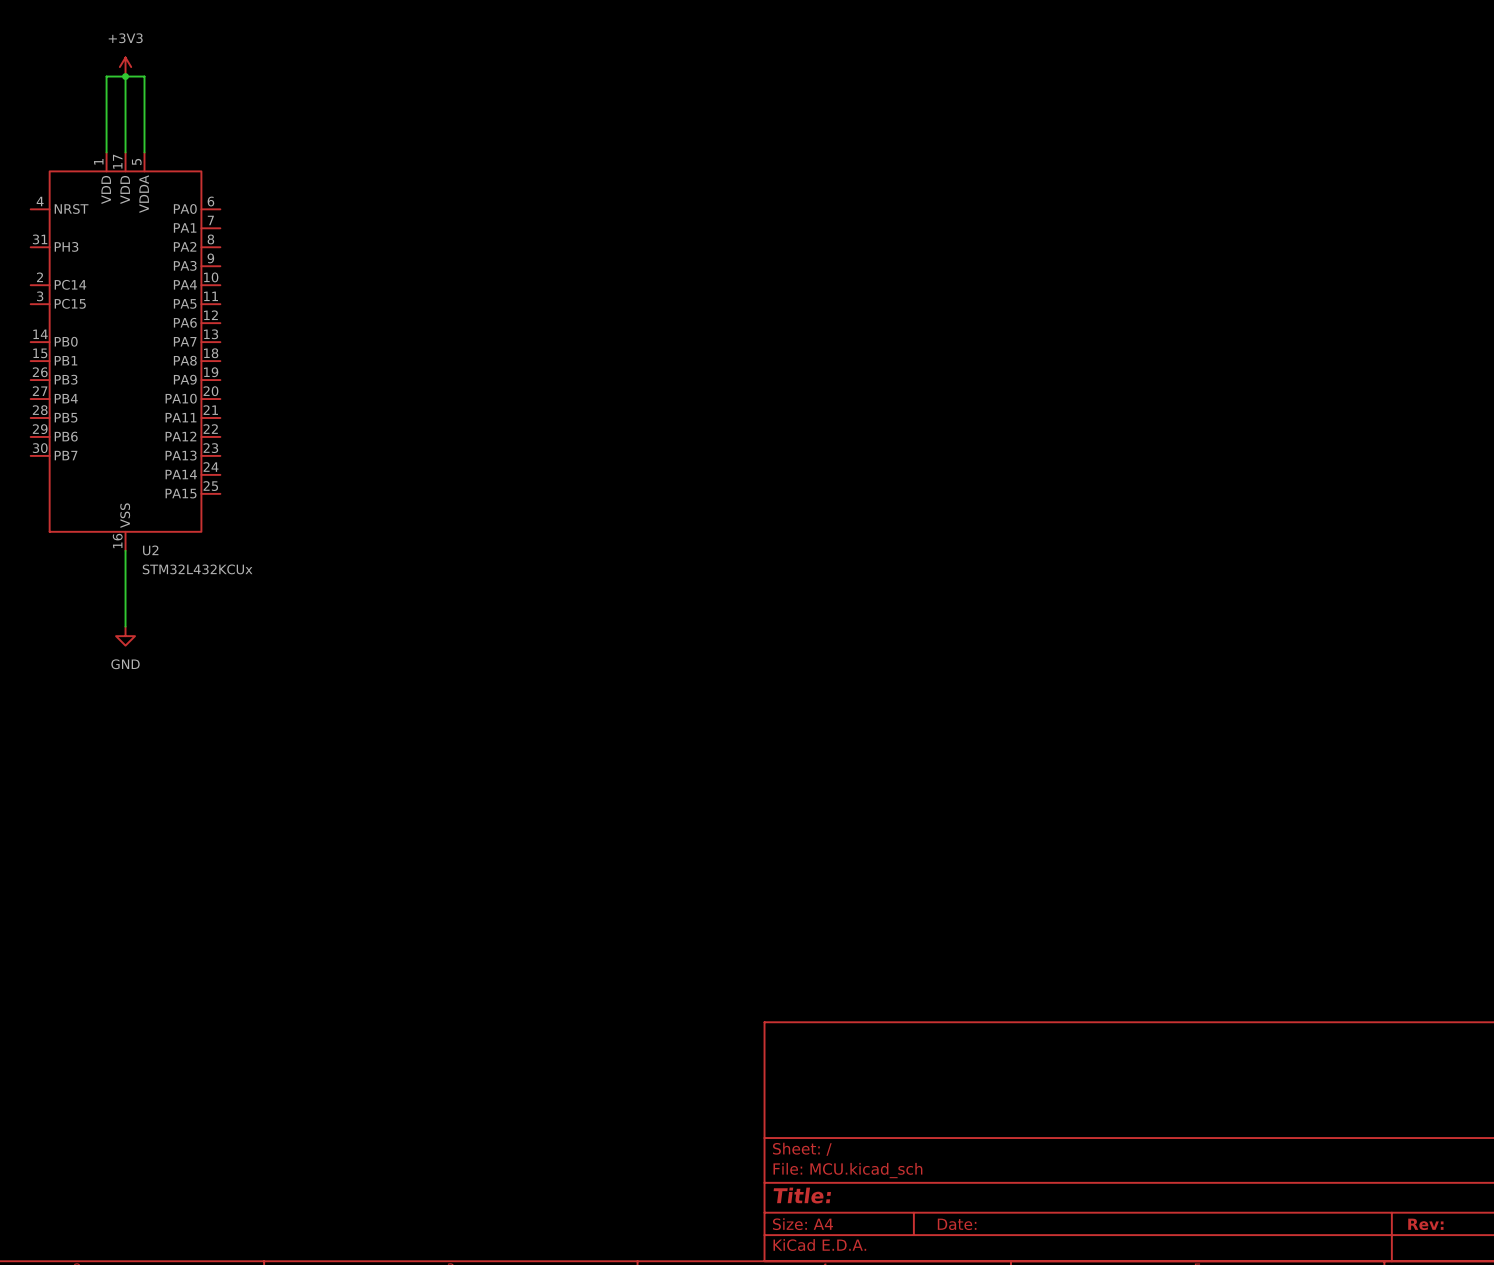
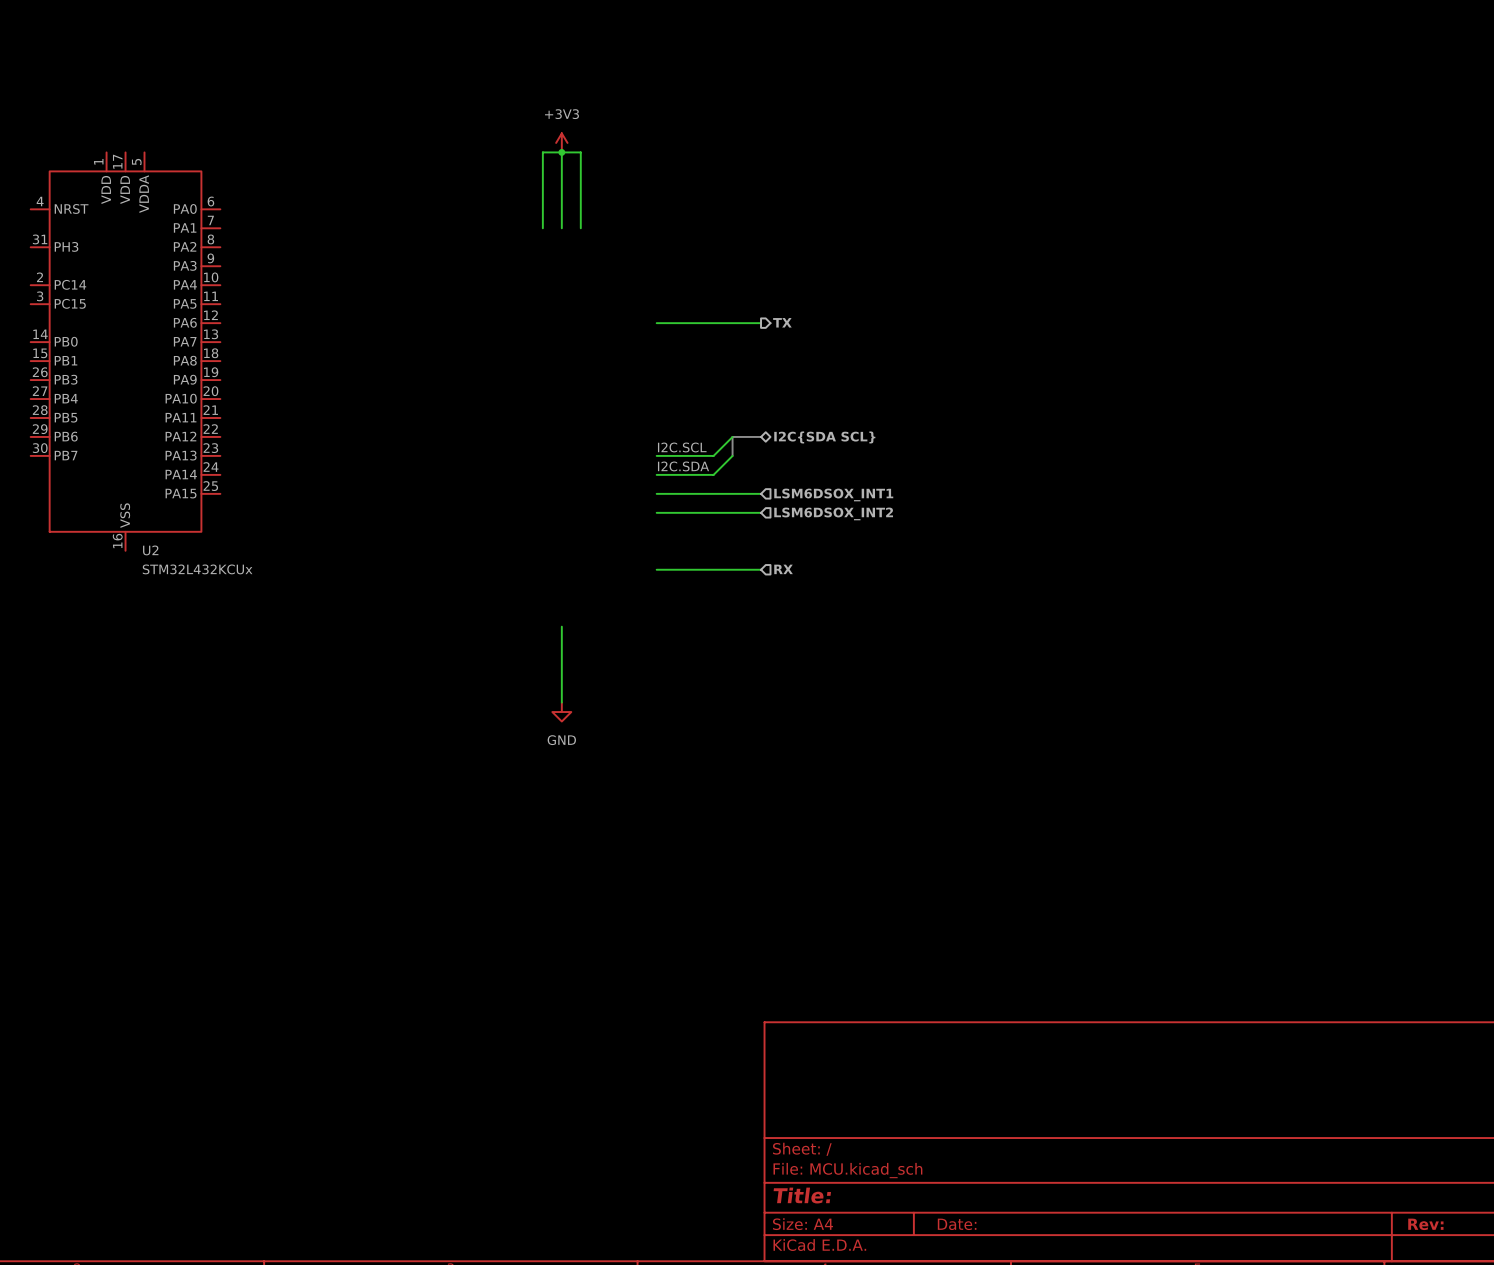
power symbol: +3V3 (125, 67) -> none
wire: (125, 76) (125, 152) -> none
junction: (125, 76) -> none
power symbol: none -> +3V3 (561, 142)
wire: (106, 152) (106, 76) (144, 76) (144, 152) -> none
wire: none -> (561, 152) (561, 228)
junction: none -> (561, 152)
wire: none -> (542, 228) (542, 152) (580, 152) (580, 228)
hierarchical label: none -> TX (782, 322)
wire: none -> (656, 323) (761, 323)
wire: none -> (732, 436) (713, 455) (656, 455)
bus: none -> (761, 436) (732, 436) (732, 455)
hierarchical label: none -> I2C{SDA SCL} (824, 437)
label: none -> I2C.SCL (682, 447)
wire: none -> (732, 455) (713, 474) (656, 474)
label: none -> I2C.SDA (683, 466)
wire: none -> (656, 493) (761, 493)
hierarchical label: none -> LSM6DSOX_INT1 (833, 494)
wire: none -> (656, 512) (761, 512)
hierarchical label: none -> LSM6DSOX_INT2 (833, 513)
wire: (125, 550) (125, 626) -> none
wire: none -> (656, 569) (761, 569)
hierarchical label: none -> RX (783, 569)
wire: none -> (561, 626) (561, 702)
power symbol: GND (125, 636) -> none
power symbol: none -> GND (561, 712)

